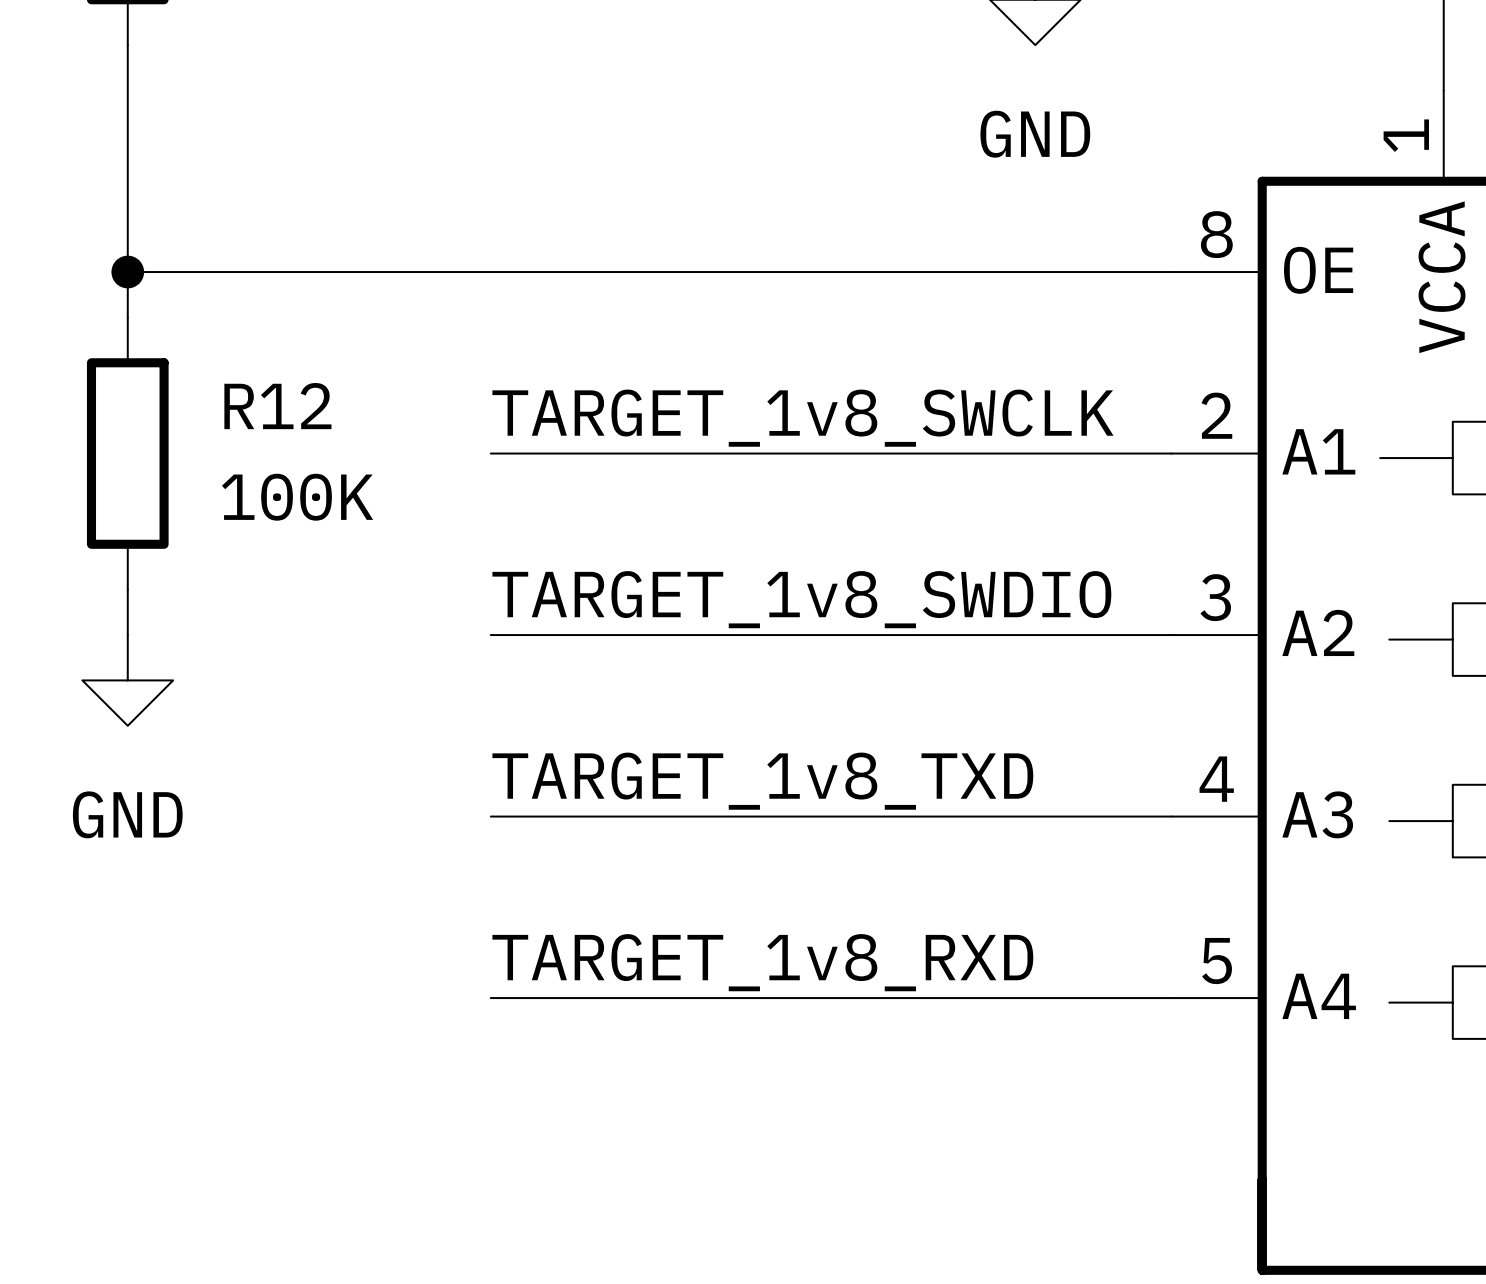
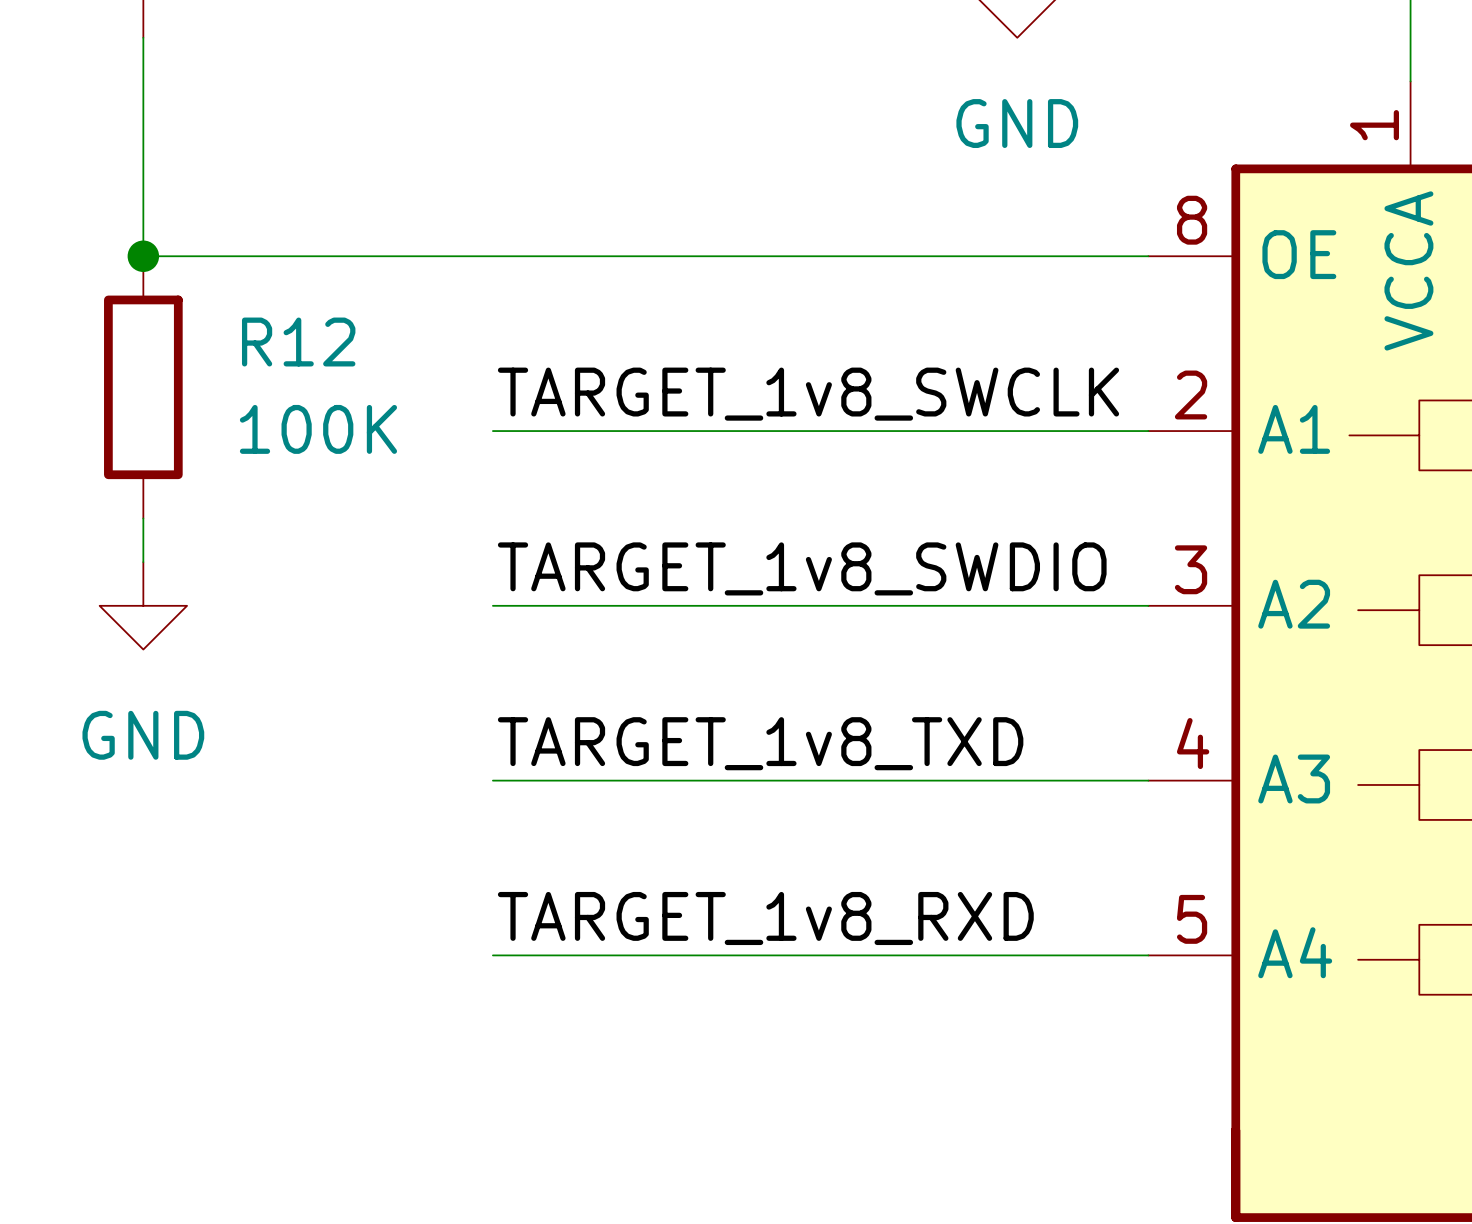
R12 position: (127, 453) -> (143, 387)
power symbol position: GND (127, 680) -> GND (143, 605)

